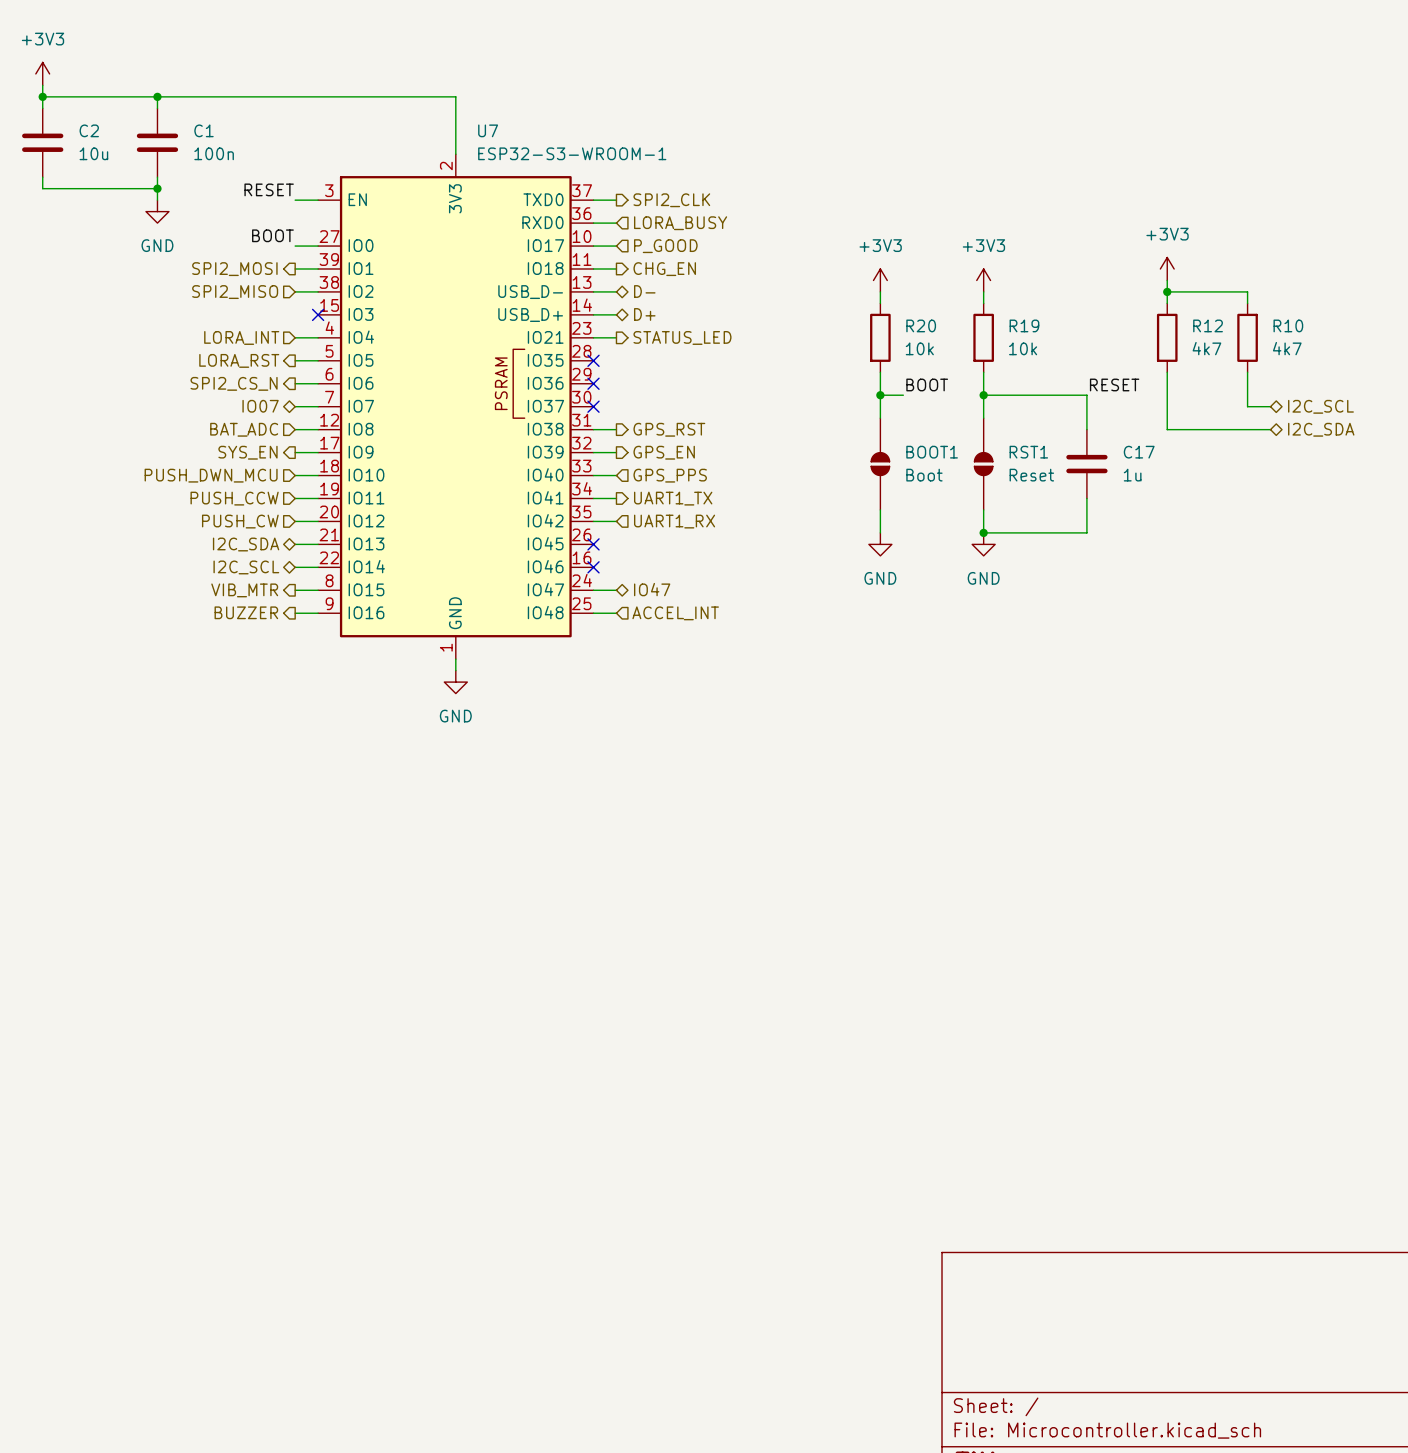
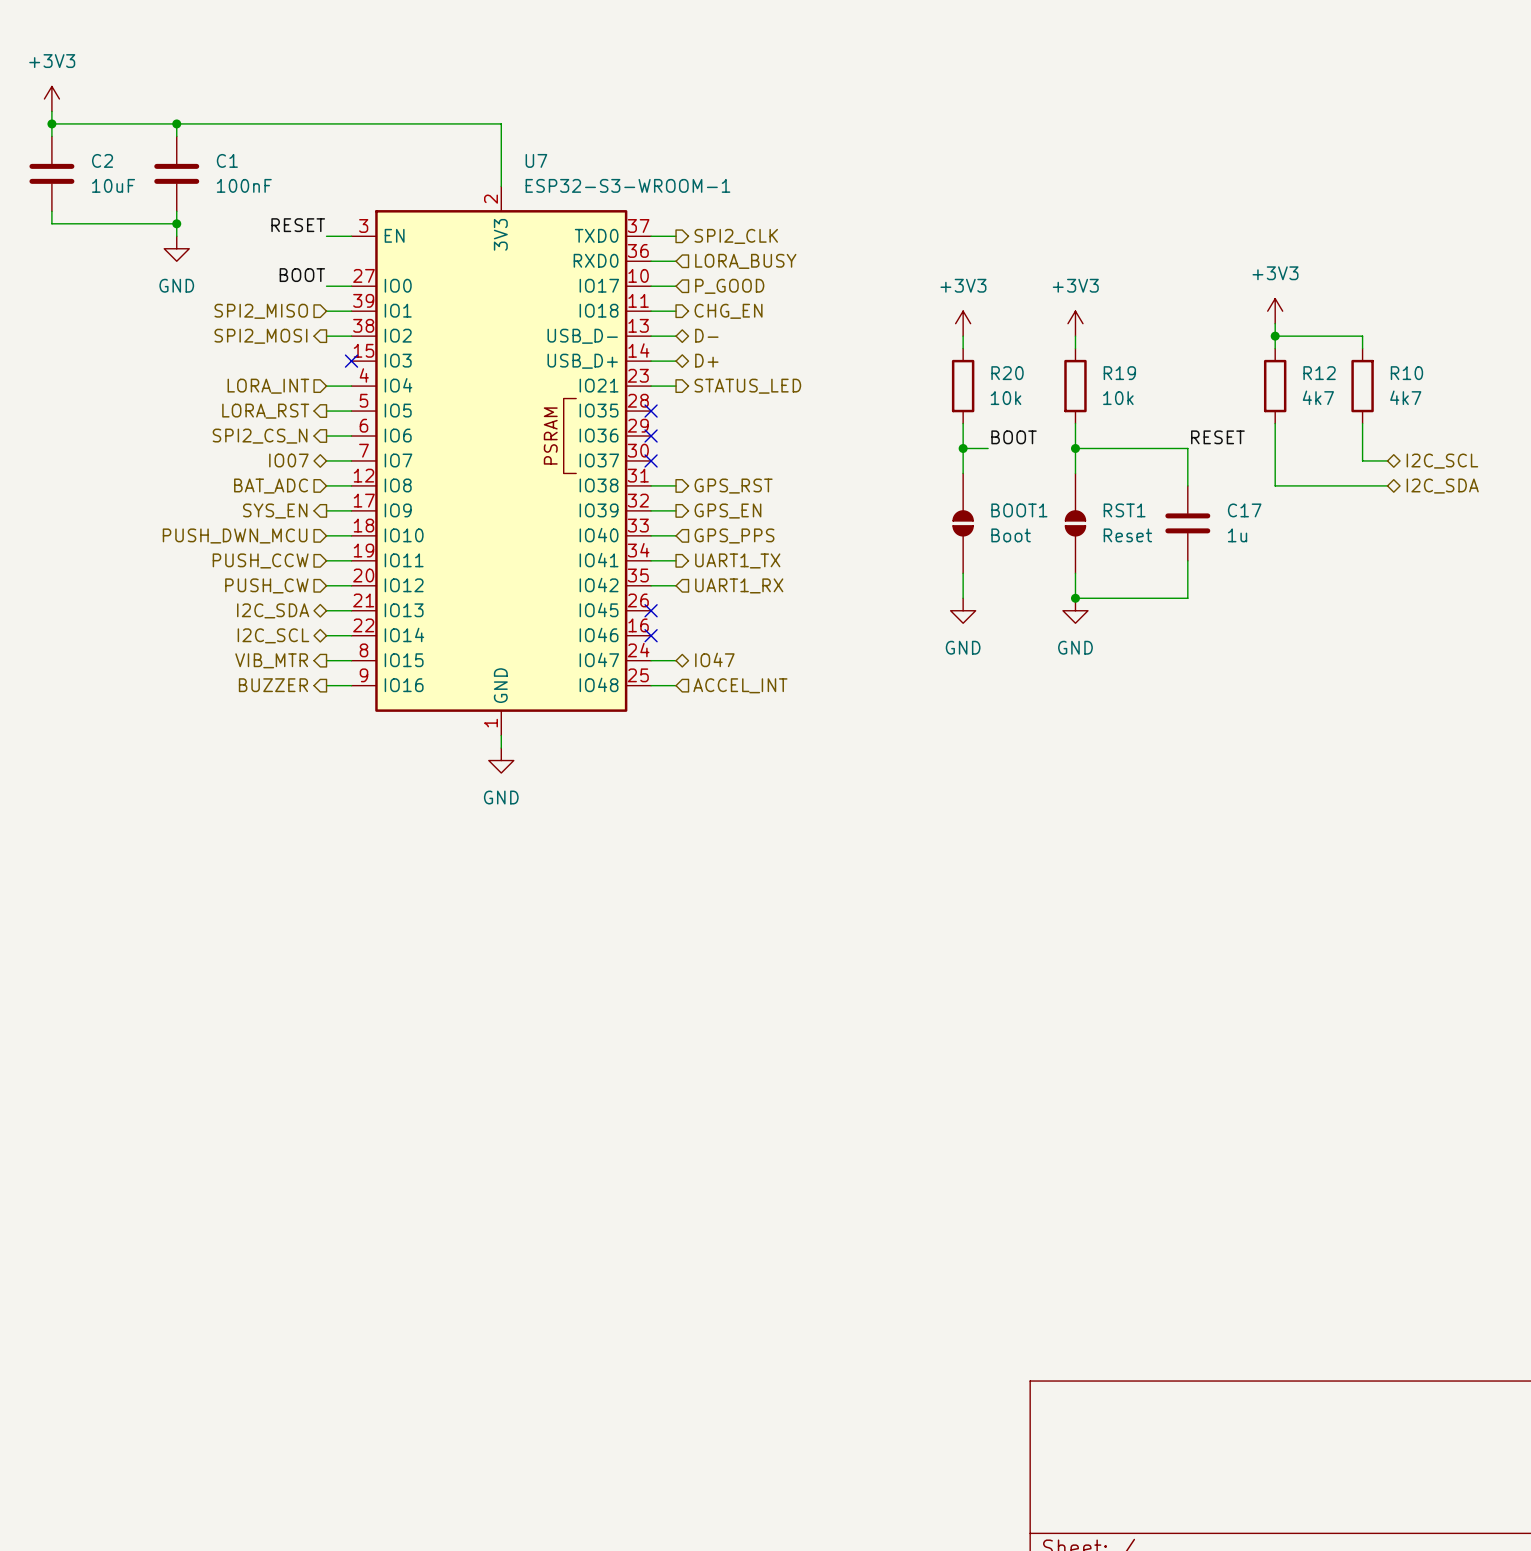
C2 value: 10u (93, 153) -> 10uF (113, 185)
C1 value: 100n (214, 153) -> 100nF (244, 185)
hierarchical label shape: output (234, 269) -> input (261, 311)
hierarchical label: SPI2_MOSI (234, 269) -> SPI2_MISO (261, 311)
hierarchical label shape: input (235, 292) -> output (260, 336)
hierarchical label: SPI2_MISO (235, 292) -> SPI2_MOSI (260, 336)

